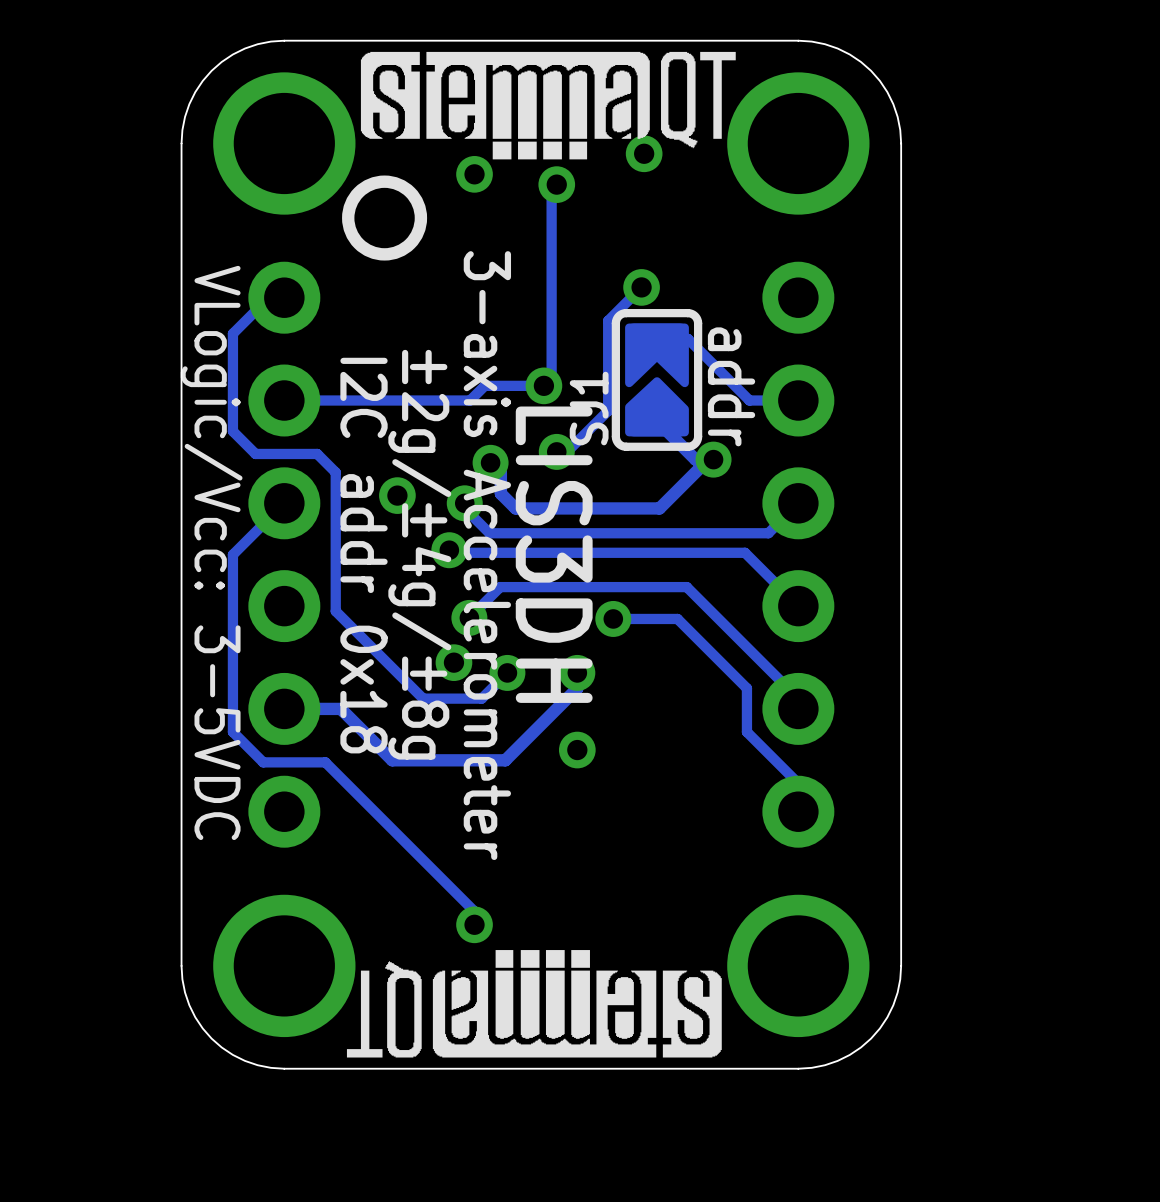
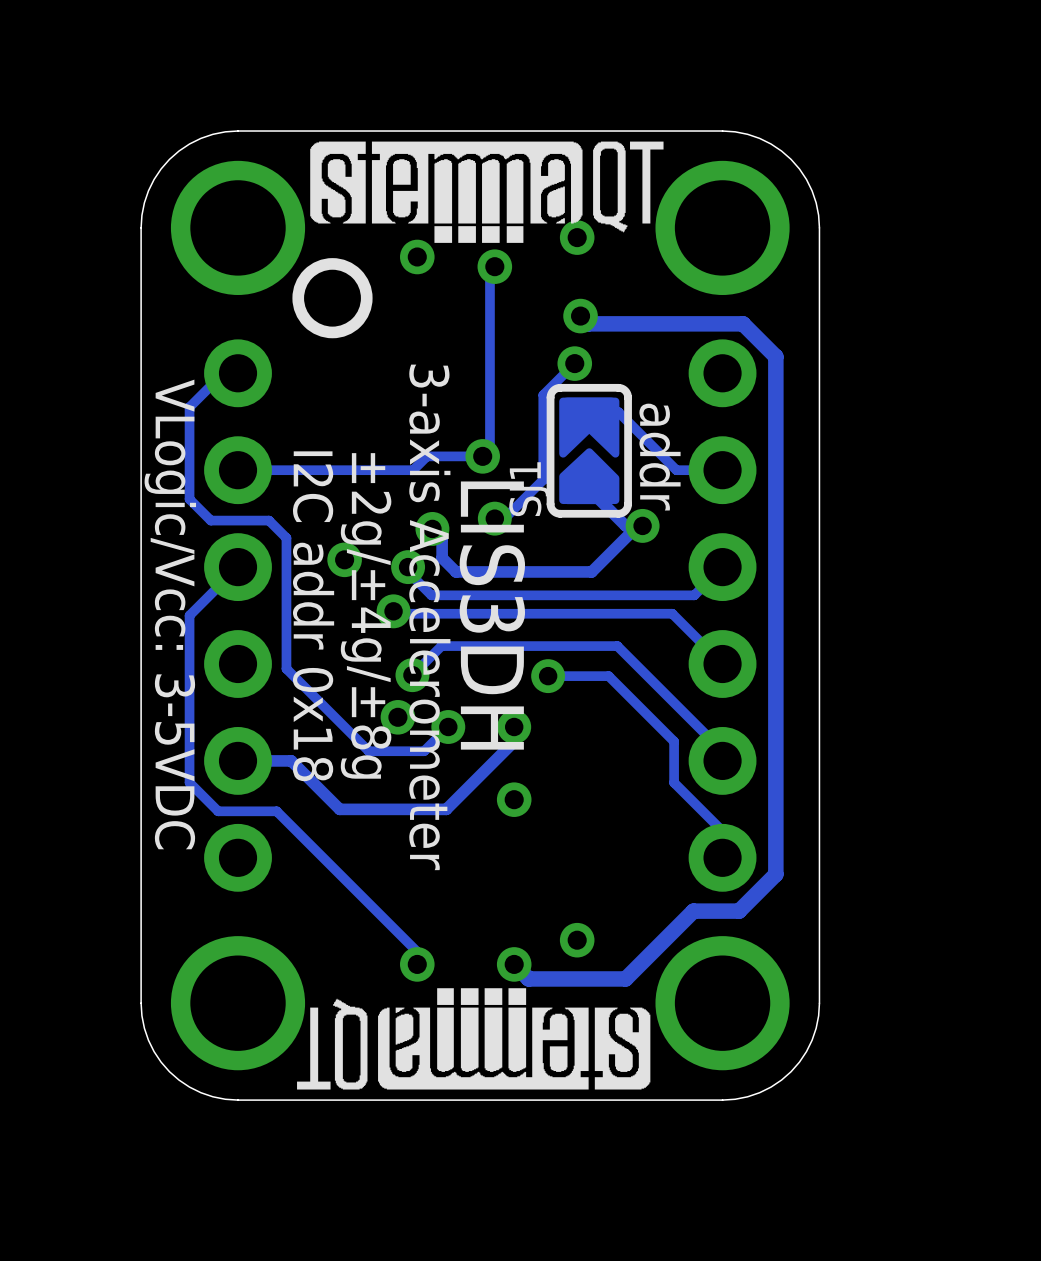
track: none -> (580, 316) (588, 323) (743, 323) (775, 356) (775, 874) (739, 911) (693, 911) (625, 978) (528, 978) (514, 964)
via: none -> (580, 316)
via: none -> (577, 940)
via: none -> (514, 964)

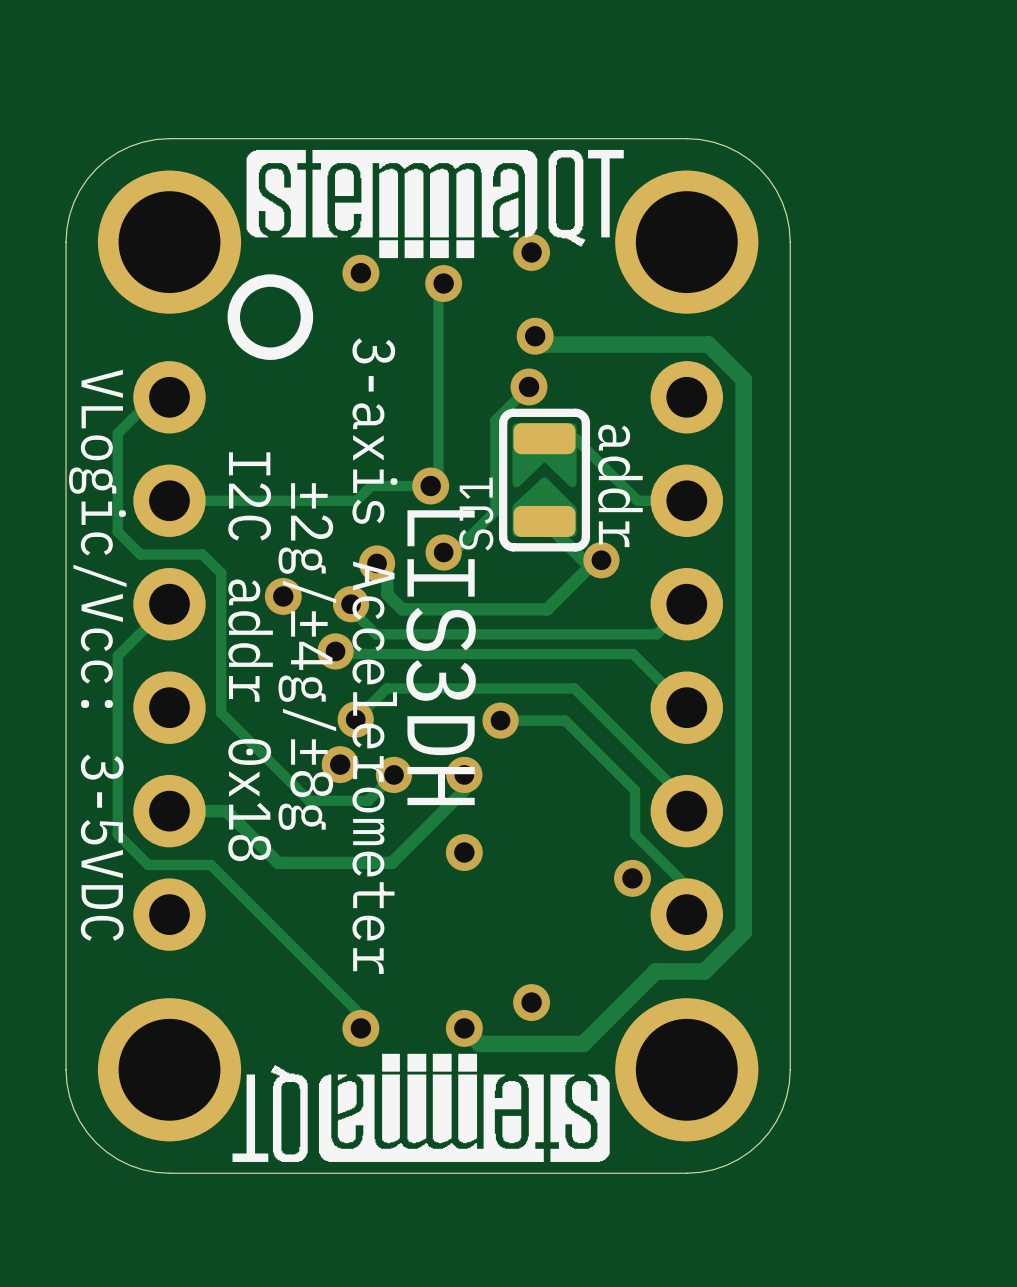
via: none -> (632, 878)

